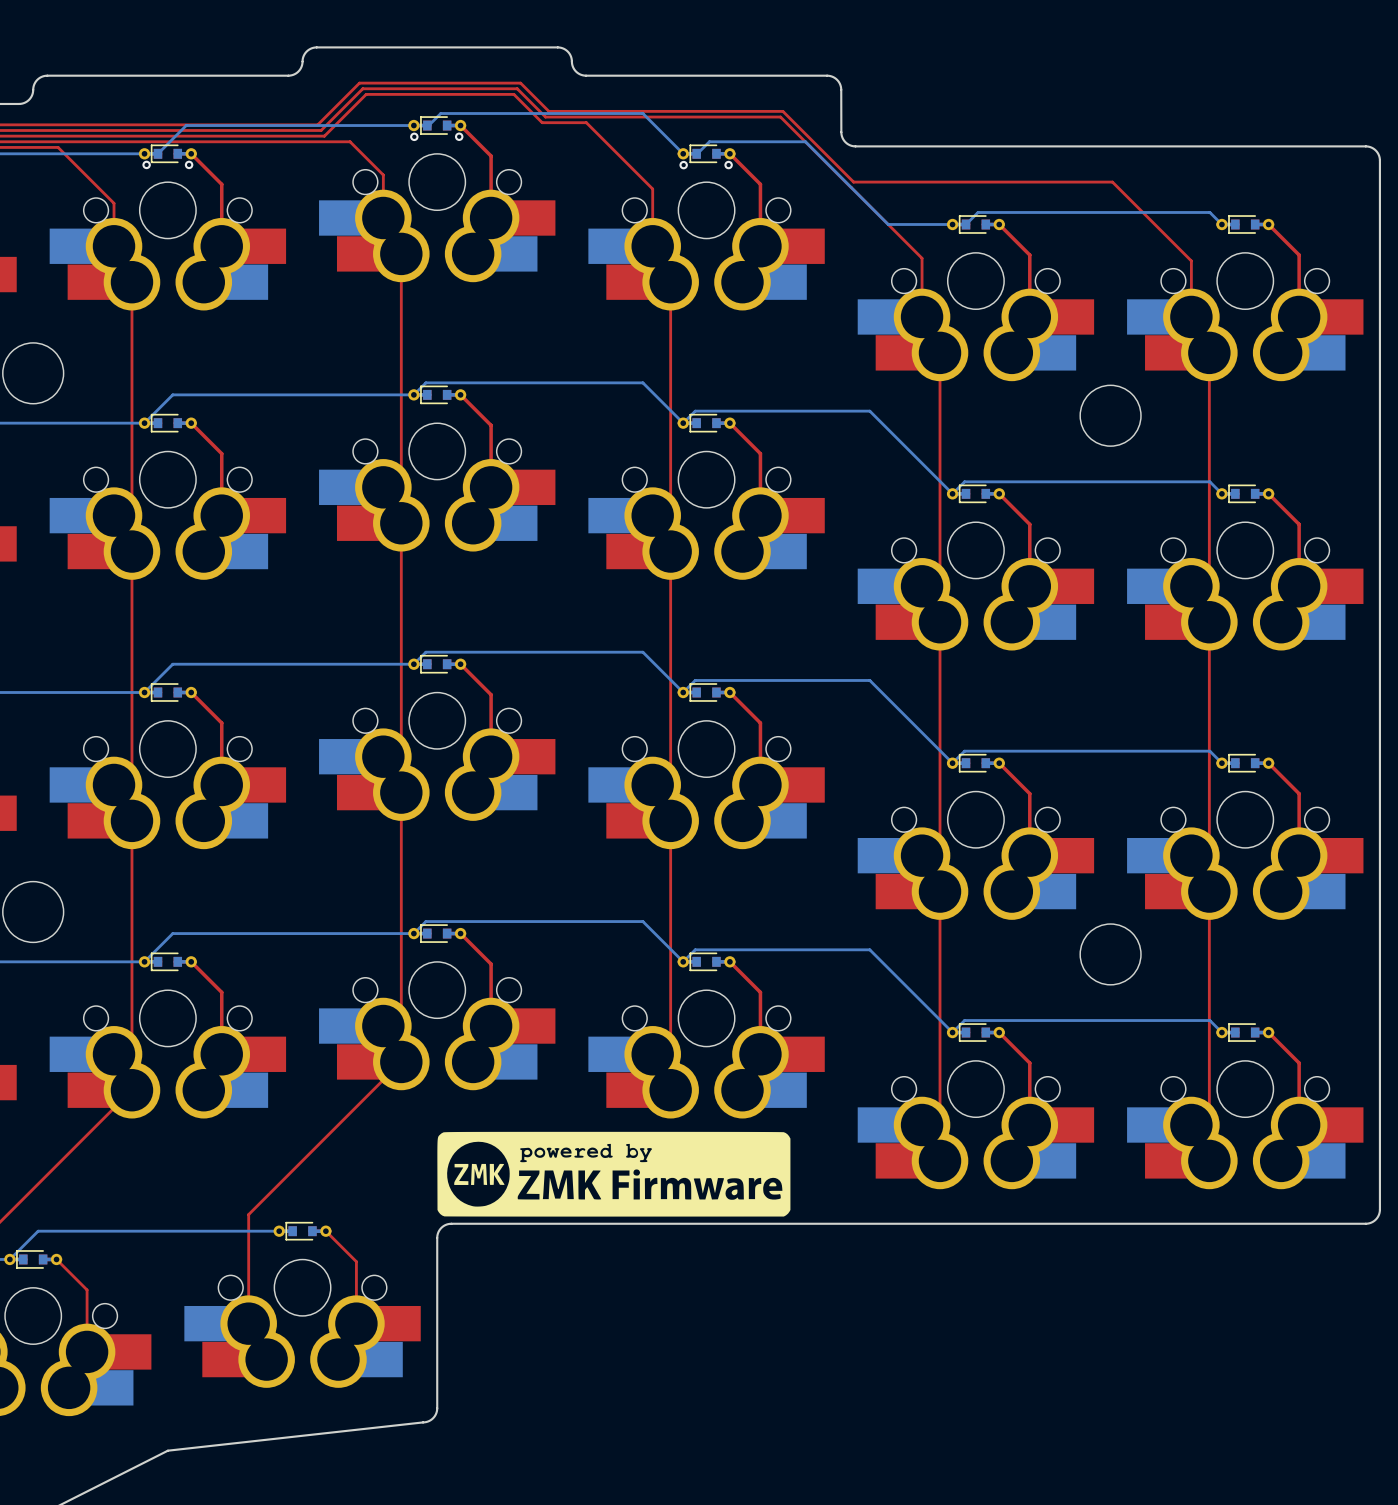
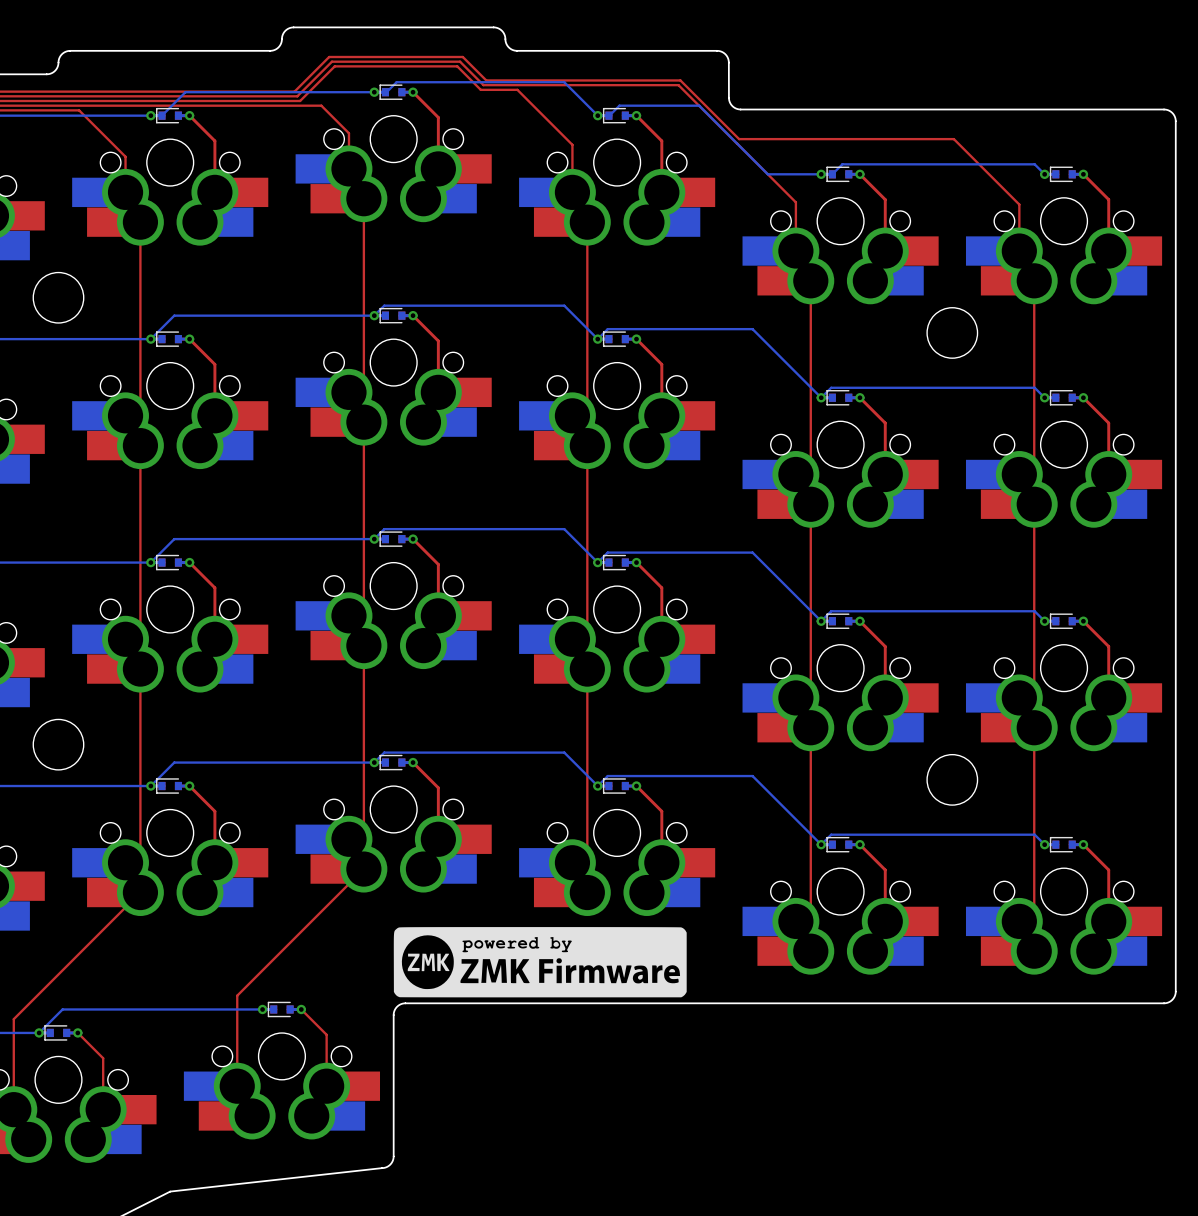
via: (414, 136) -> none
via: (459, 136) -> none
via: (146, 164) -> none
via: (189, 164) -> none
via: (683, 165) -> none
via: (728, 165) -> none

